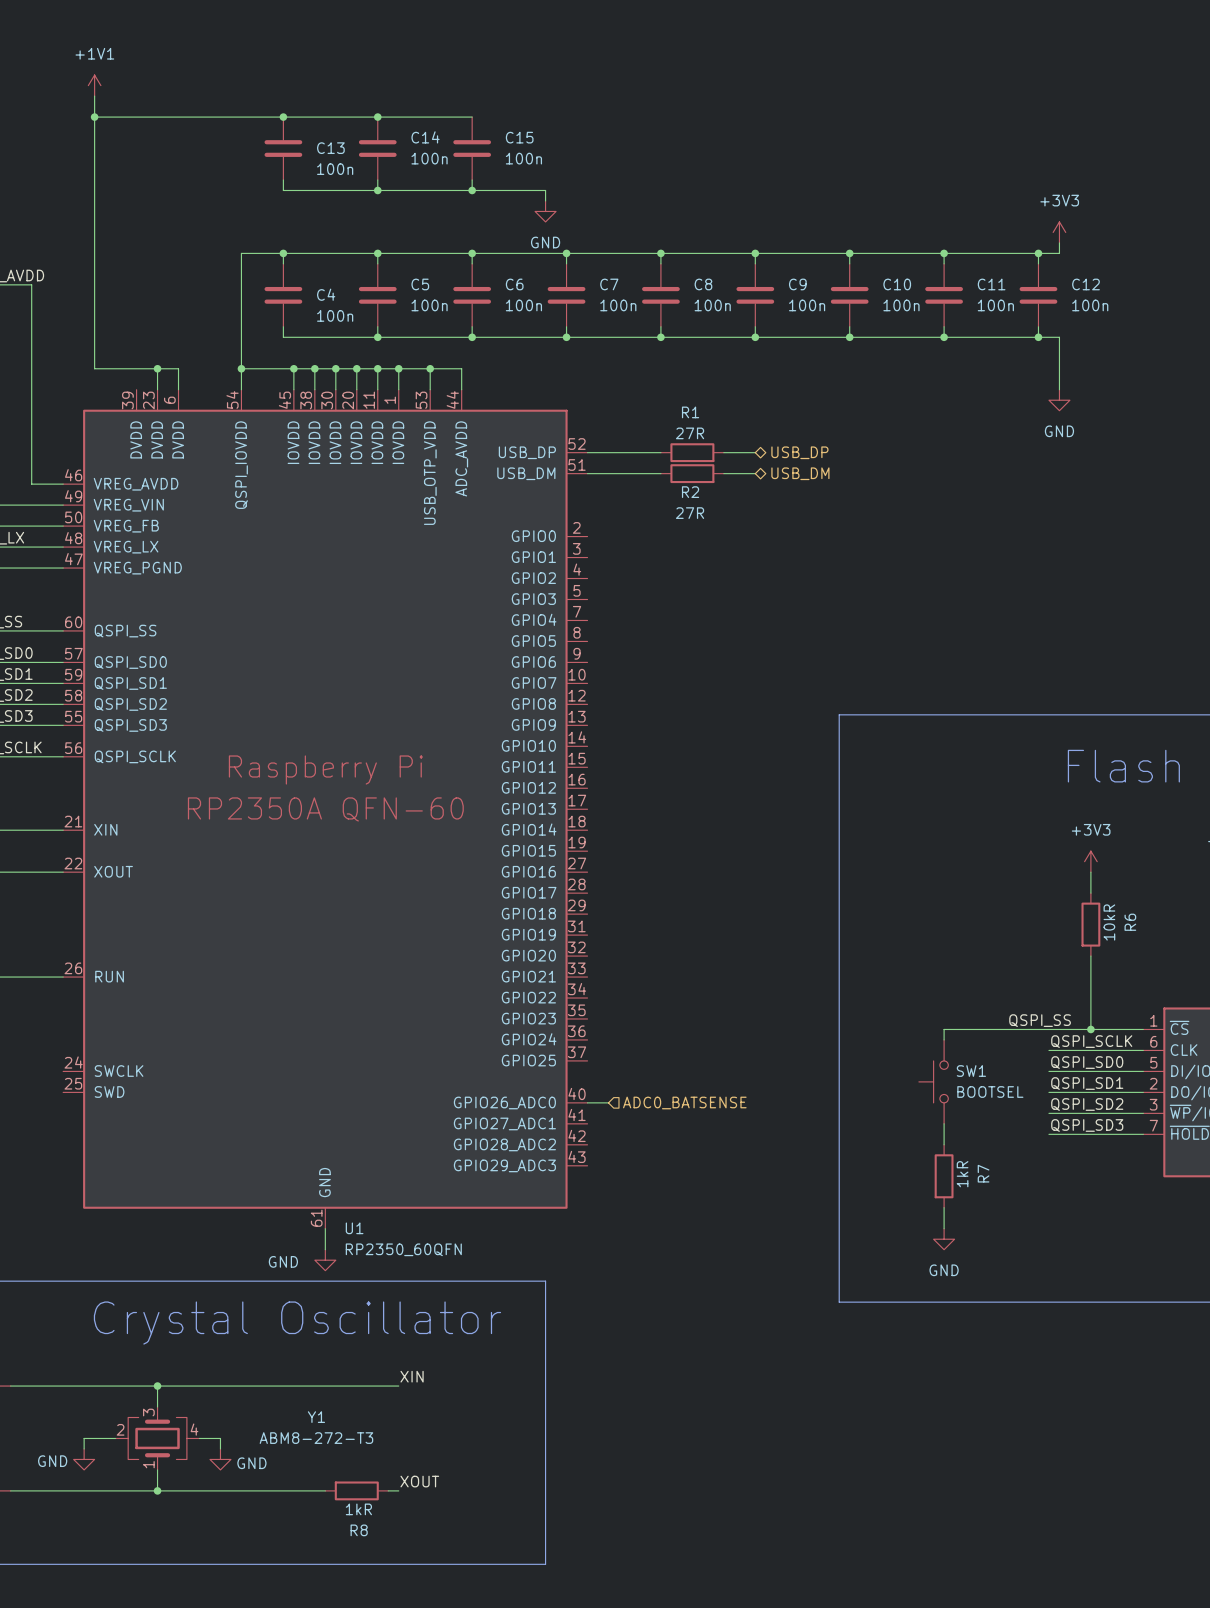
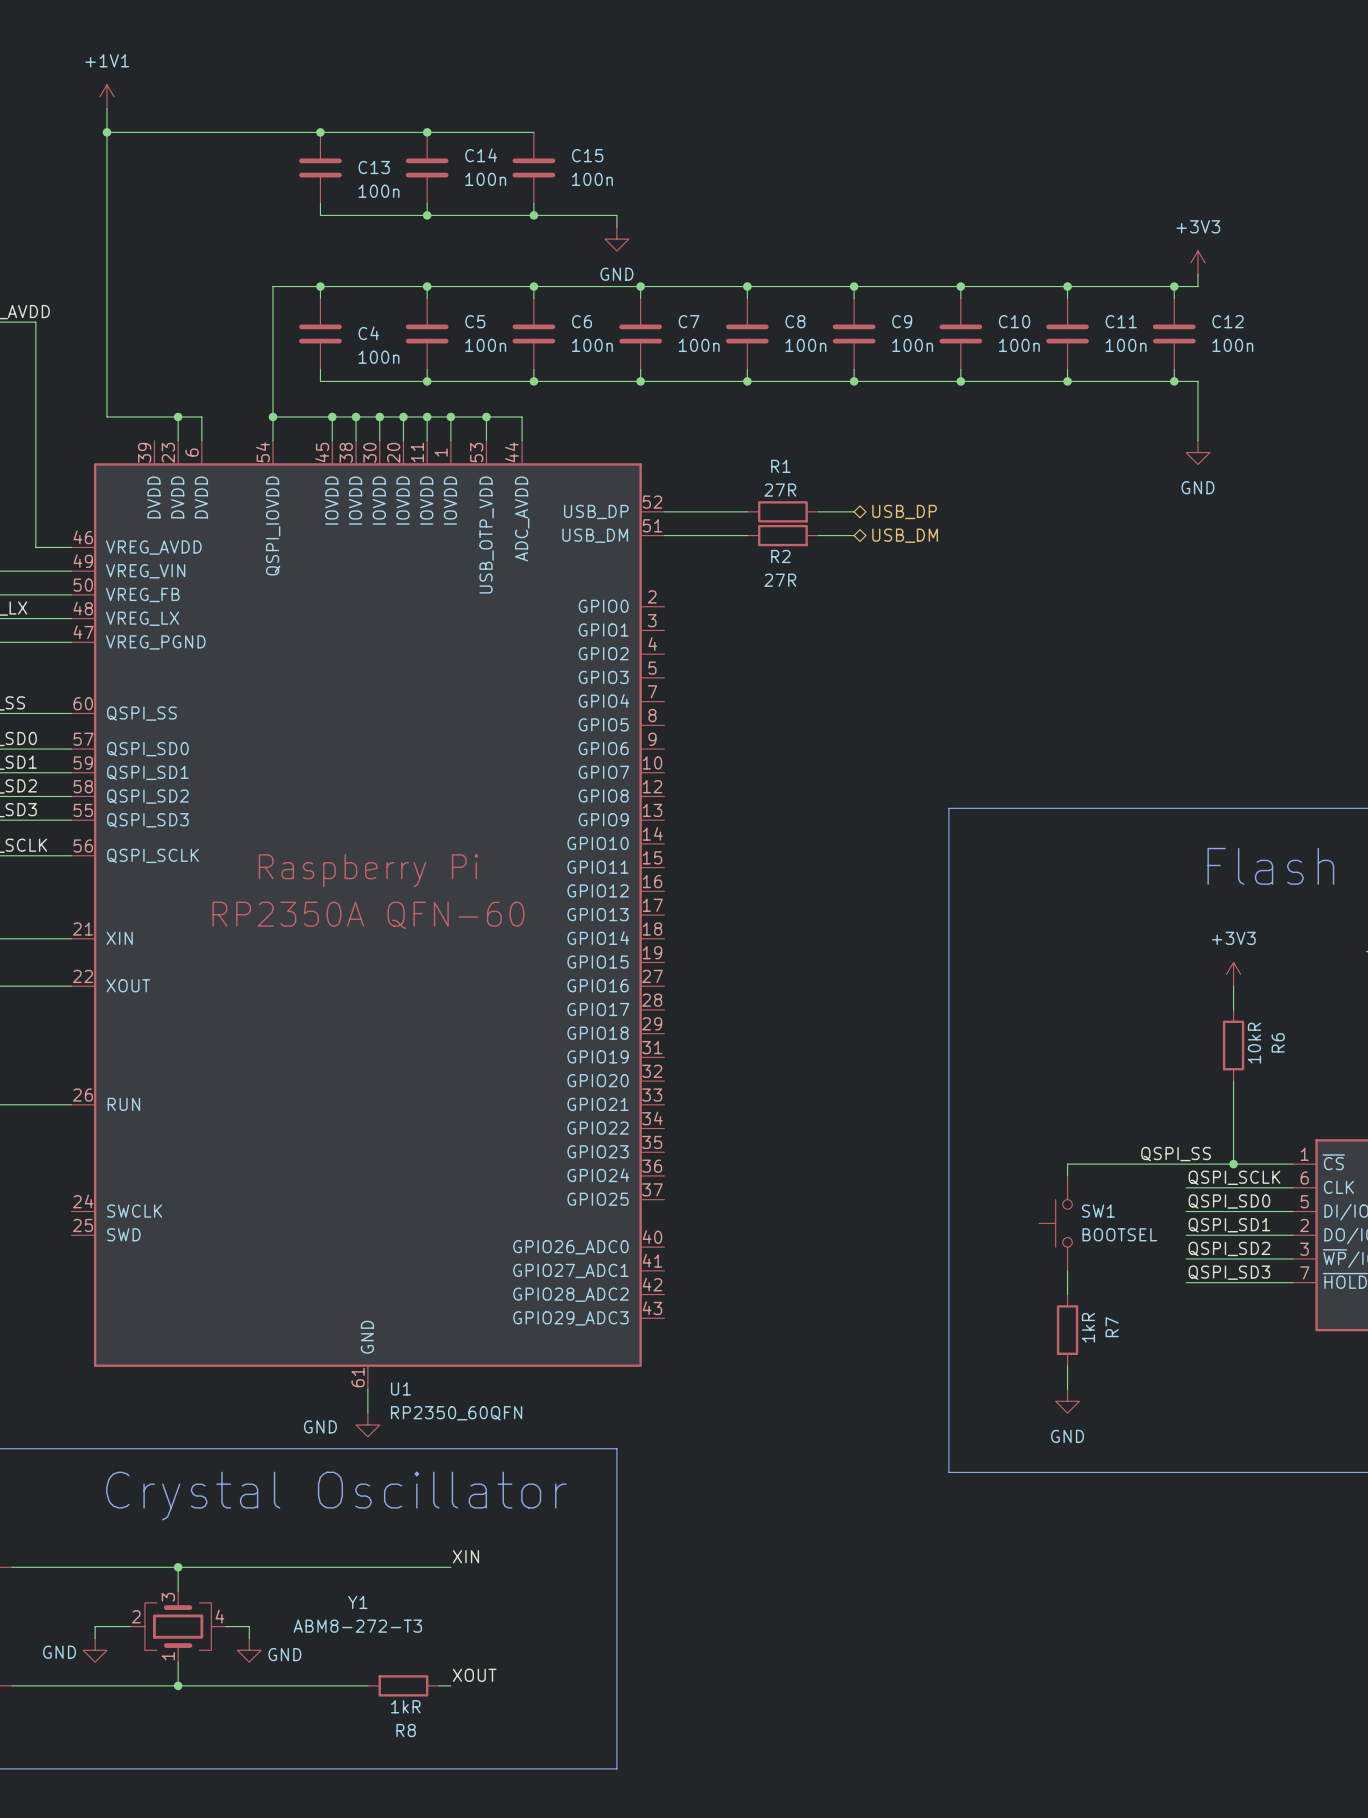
wire: (587, 1102) (608, 1102) -> none
hierarchical label: ADC0_BATSENSE (684, 1102) -> none

